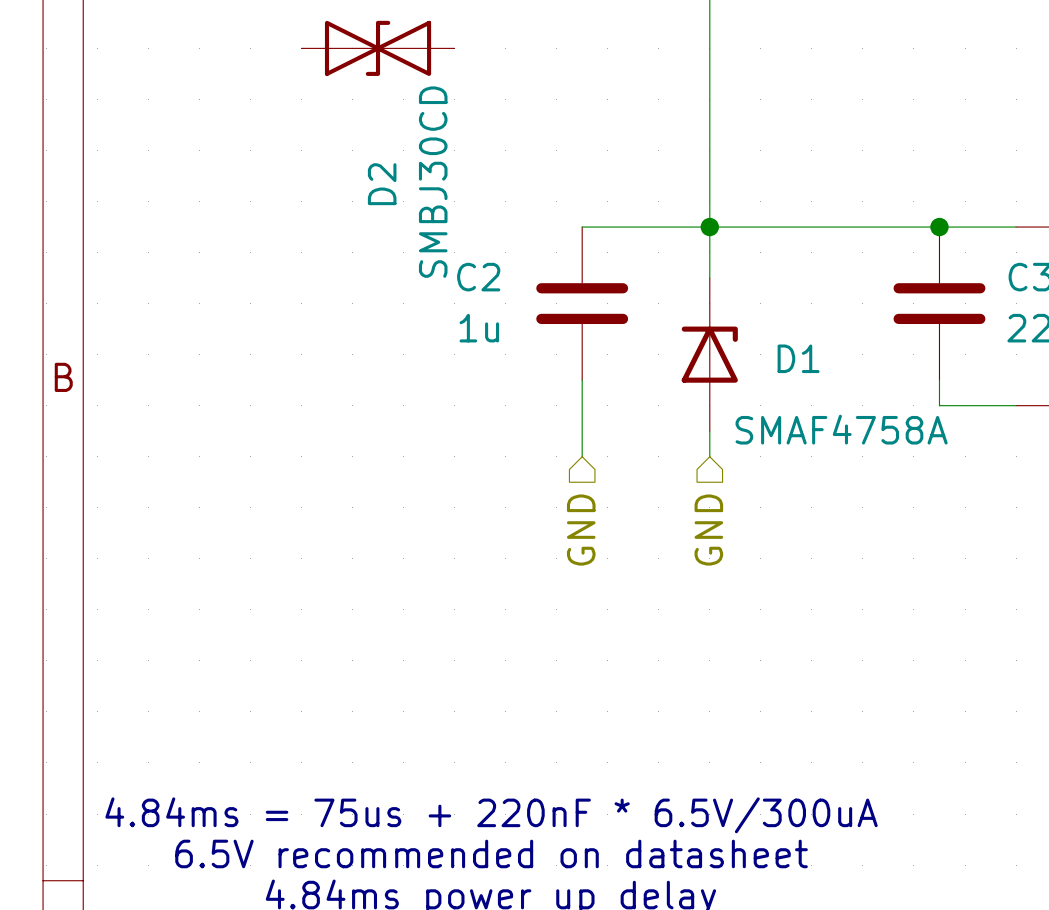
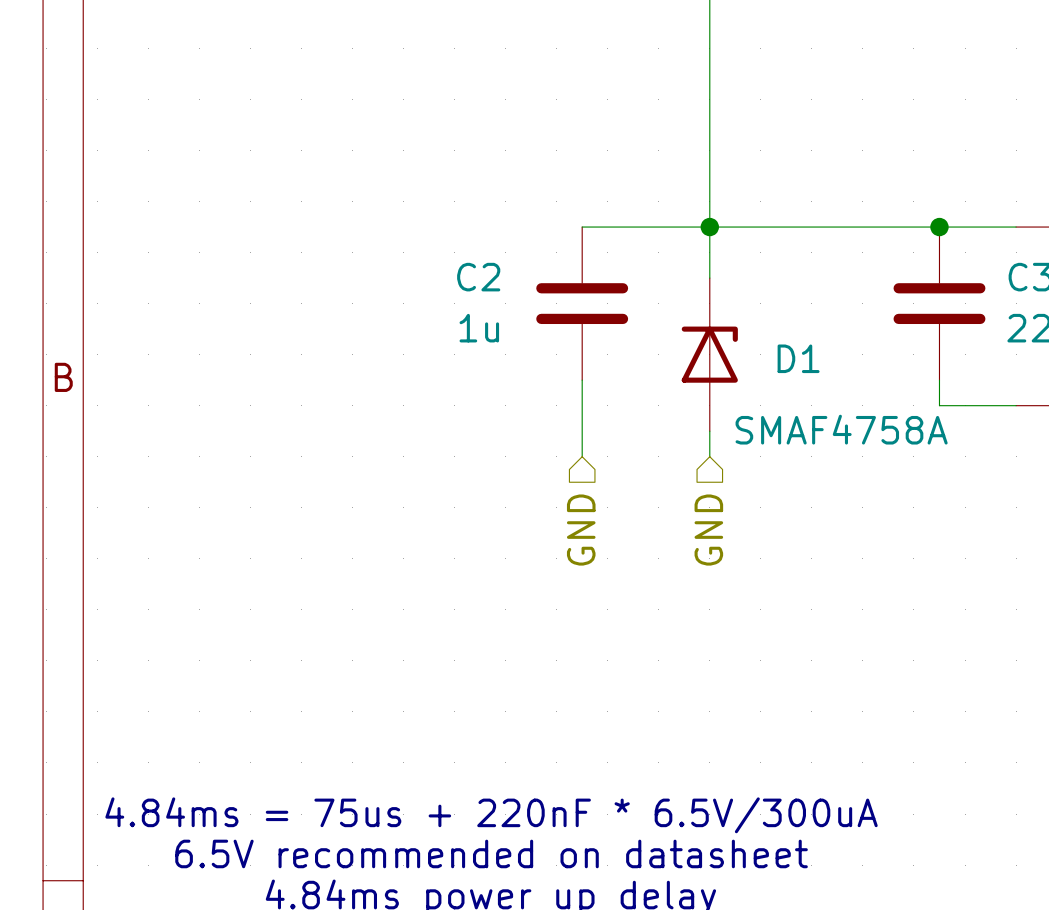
D2: SMBJ30CD (378, 48) -> none

